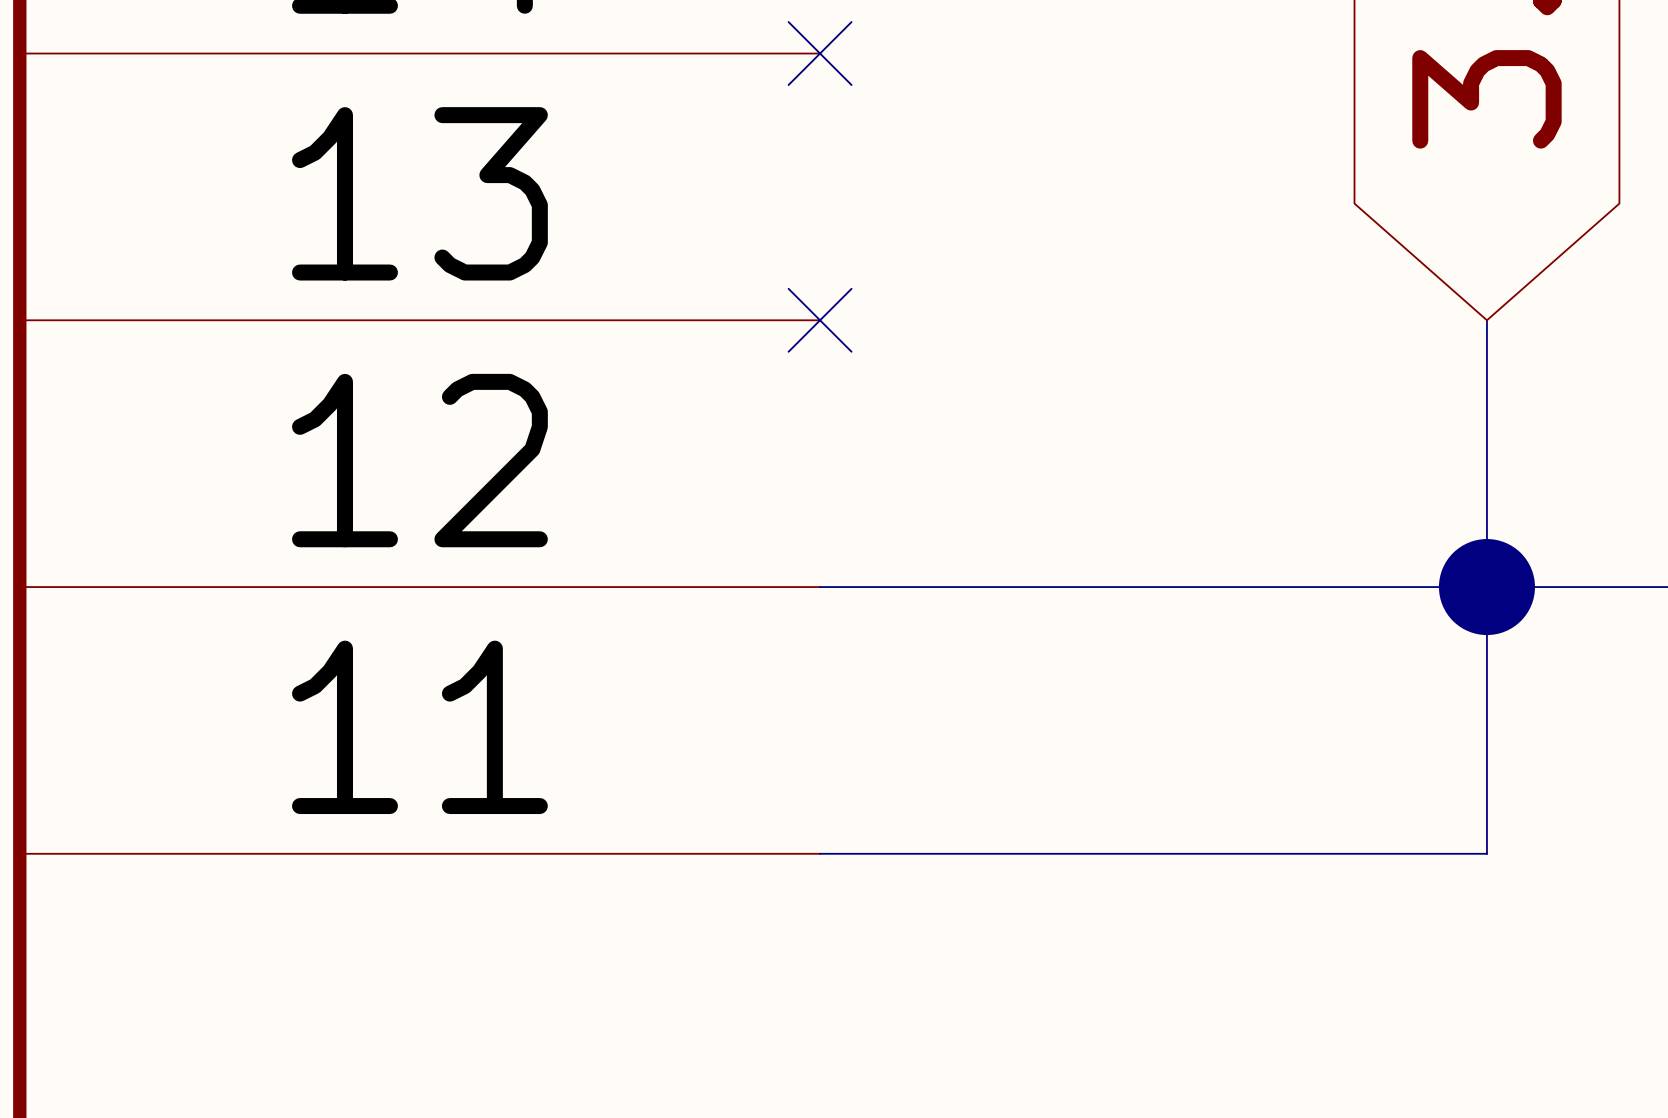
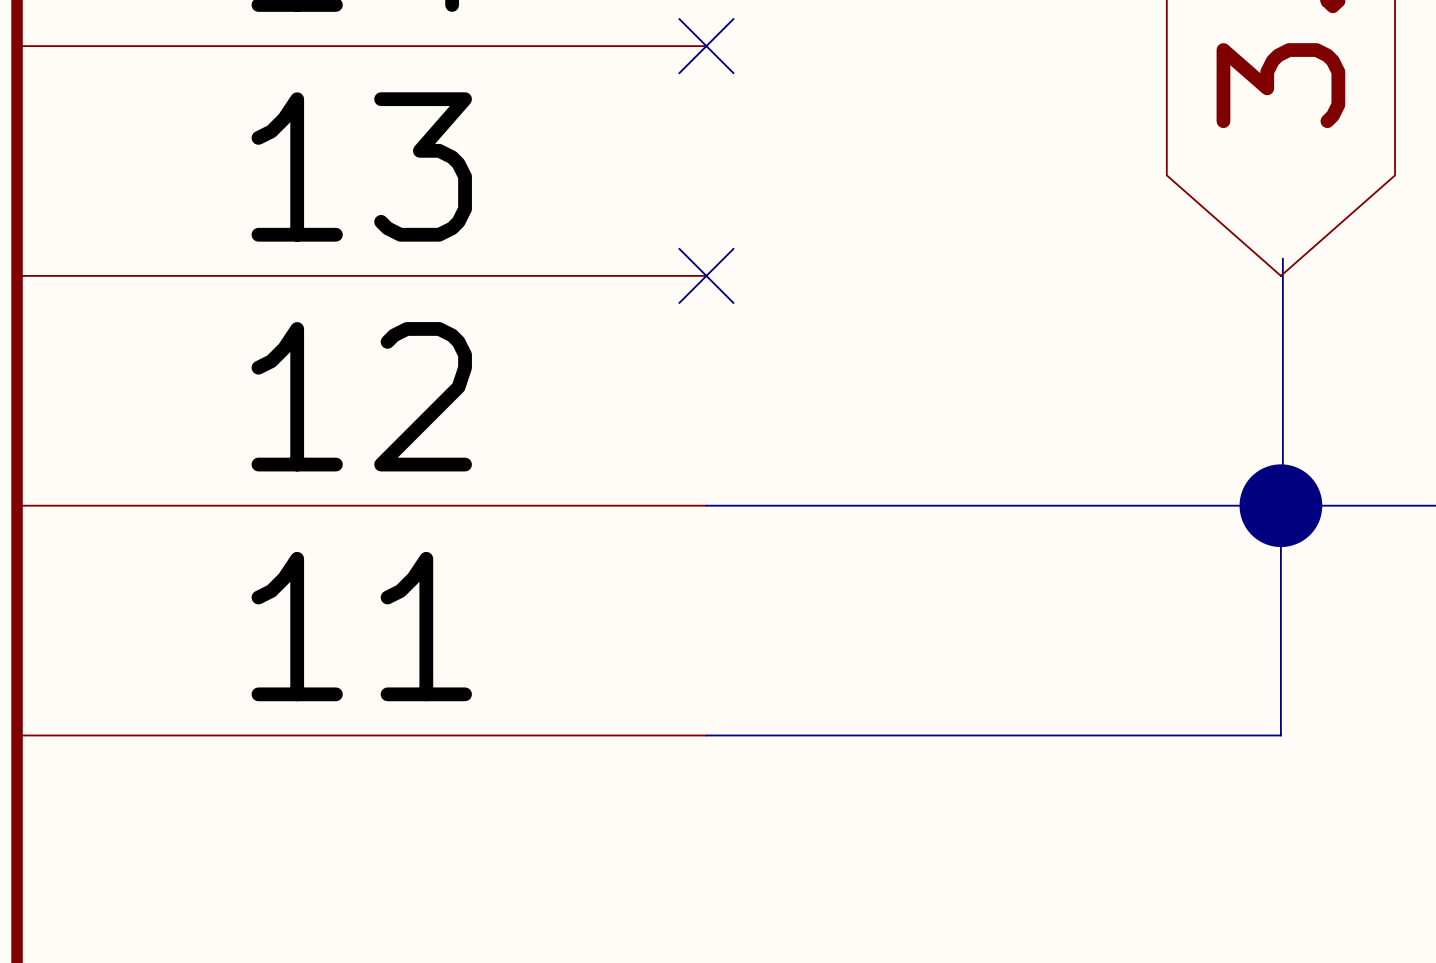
wire: (1486, 320) (1486, 587) -> (1282, 258) (1282, 505)

